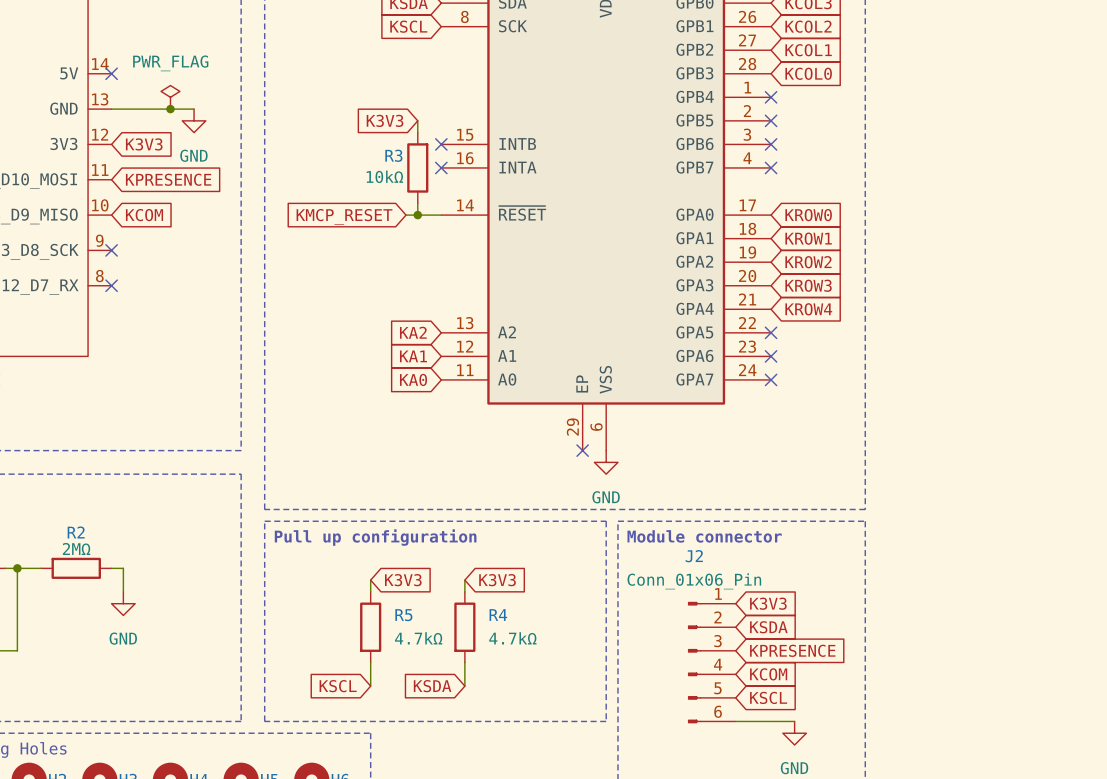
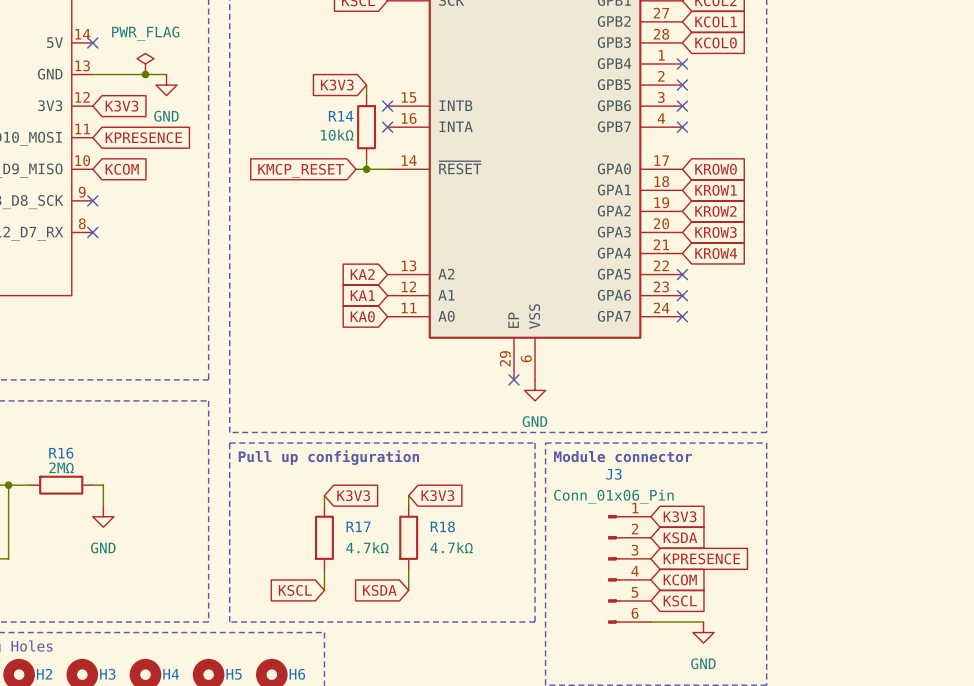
R3 name: R3 (393, 155) -> R14 (341, 116)
R2 name: R2 (76, 532) -> R16 (61, 453)
J2 name: J2 (694, 556) -> J3 (613, 474)
R5 name: R5 (403, 615) -> R17 (358, 526)
R4 name: R4 (498, 615) -> R18 (442, 526)

